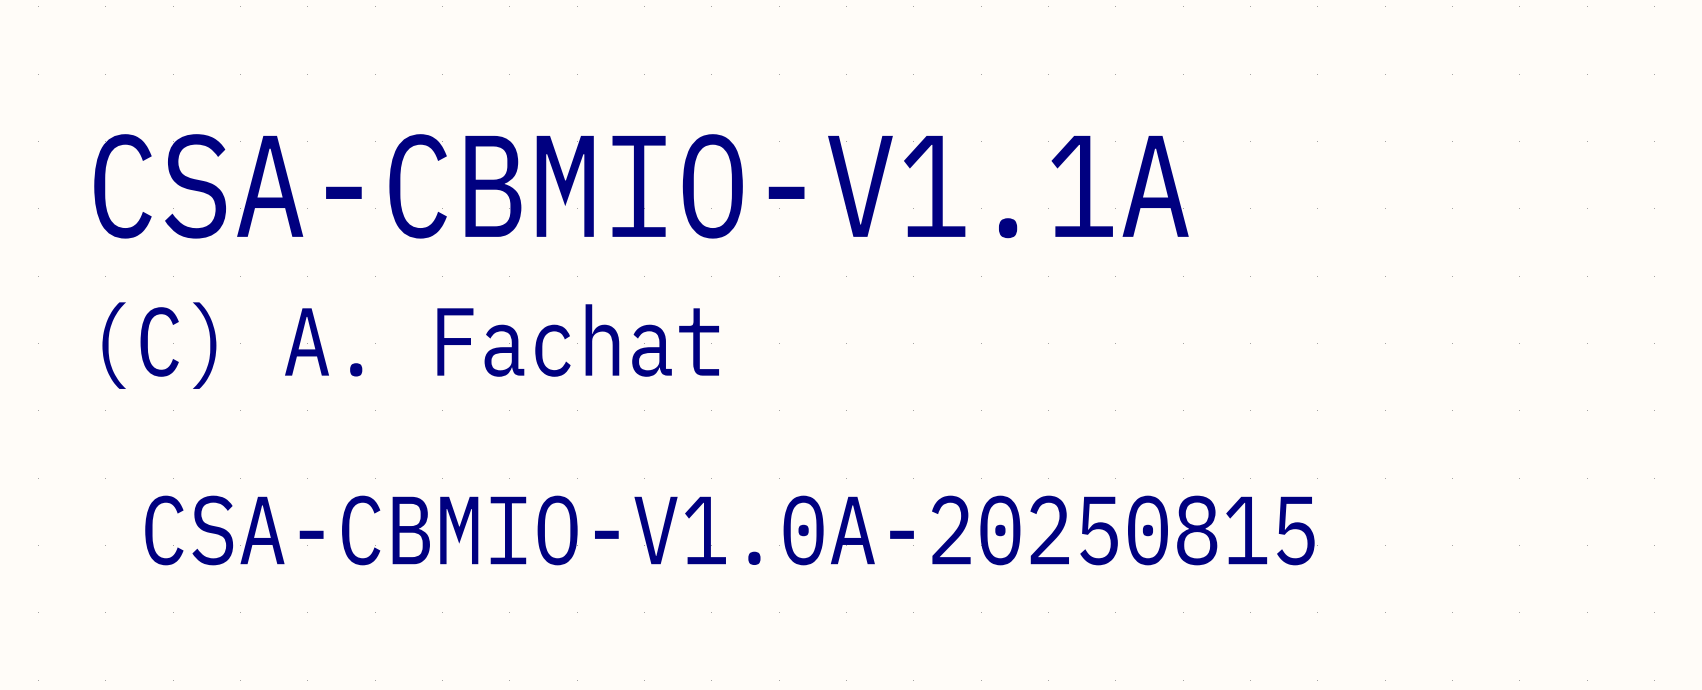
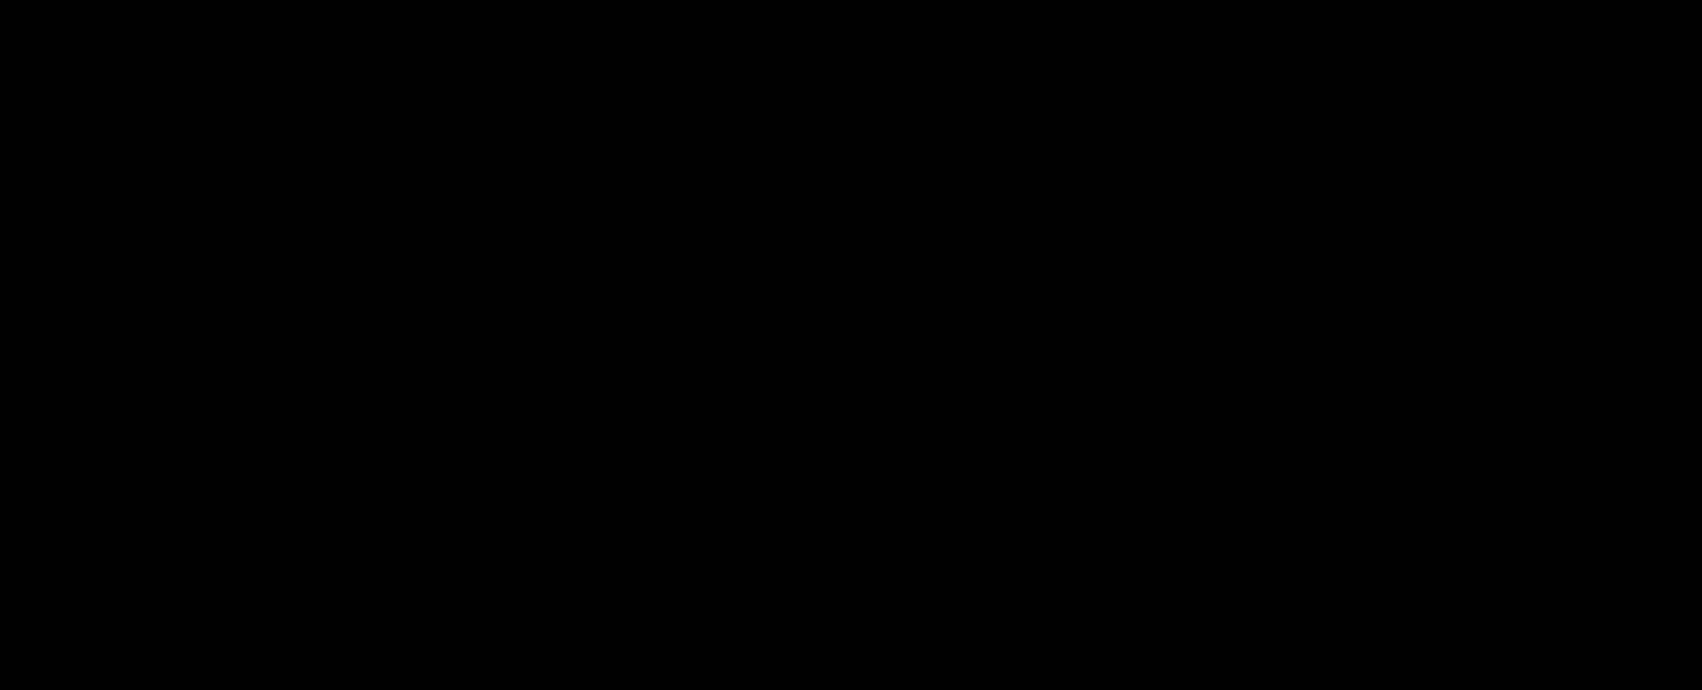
text: CSA-CBMIO-V1.1A (641, 186) -> none
text: (C) A. Fachat (410, 345) -> none
text: CSA-CBMIO-V1.0A-20250815 (729, 530) -> none

